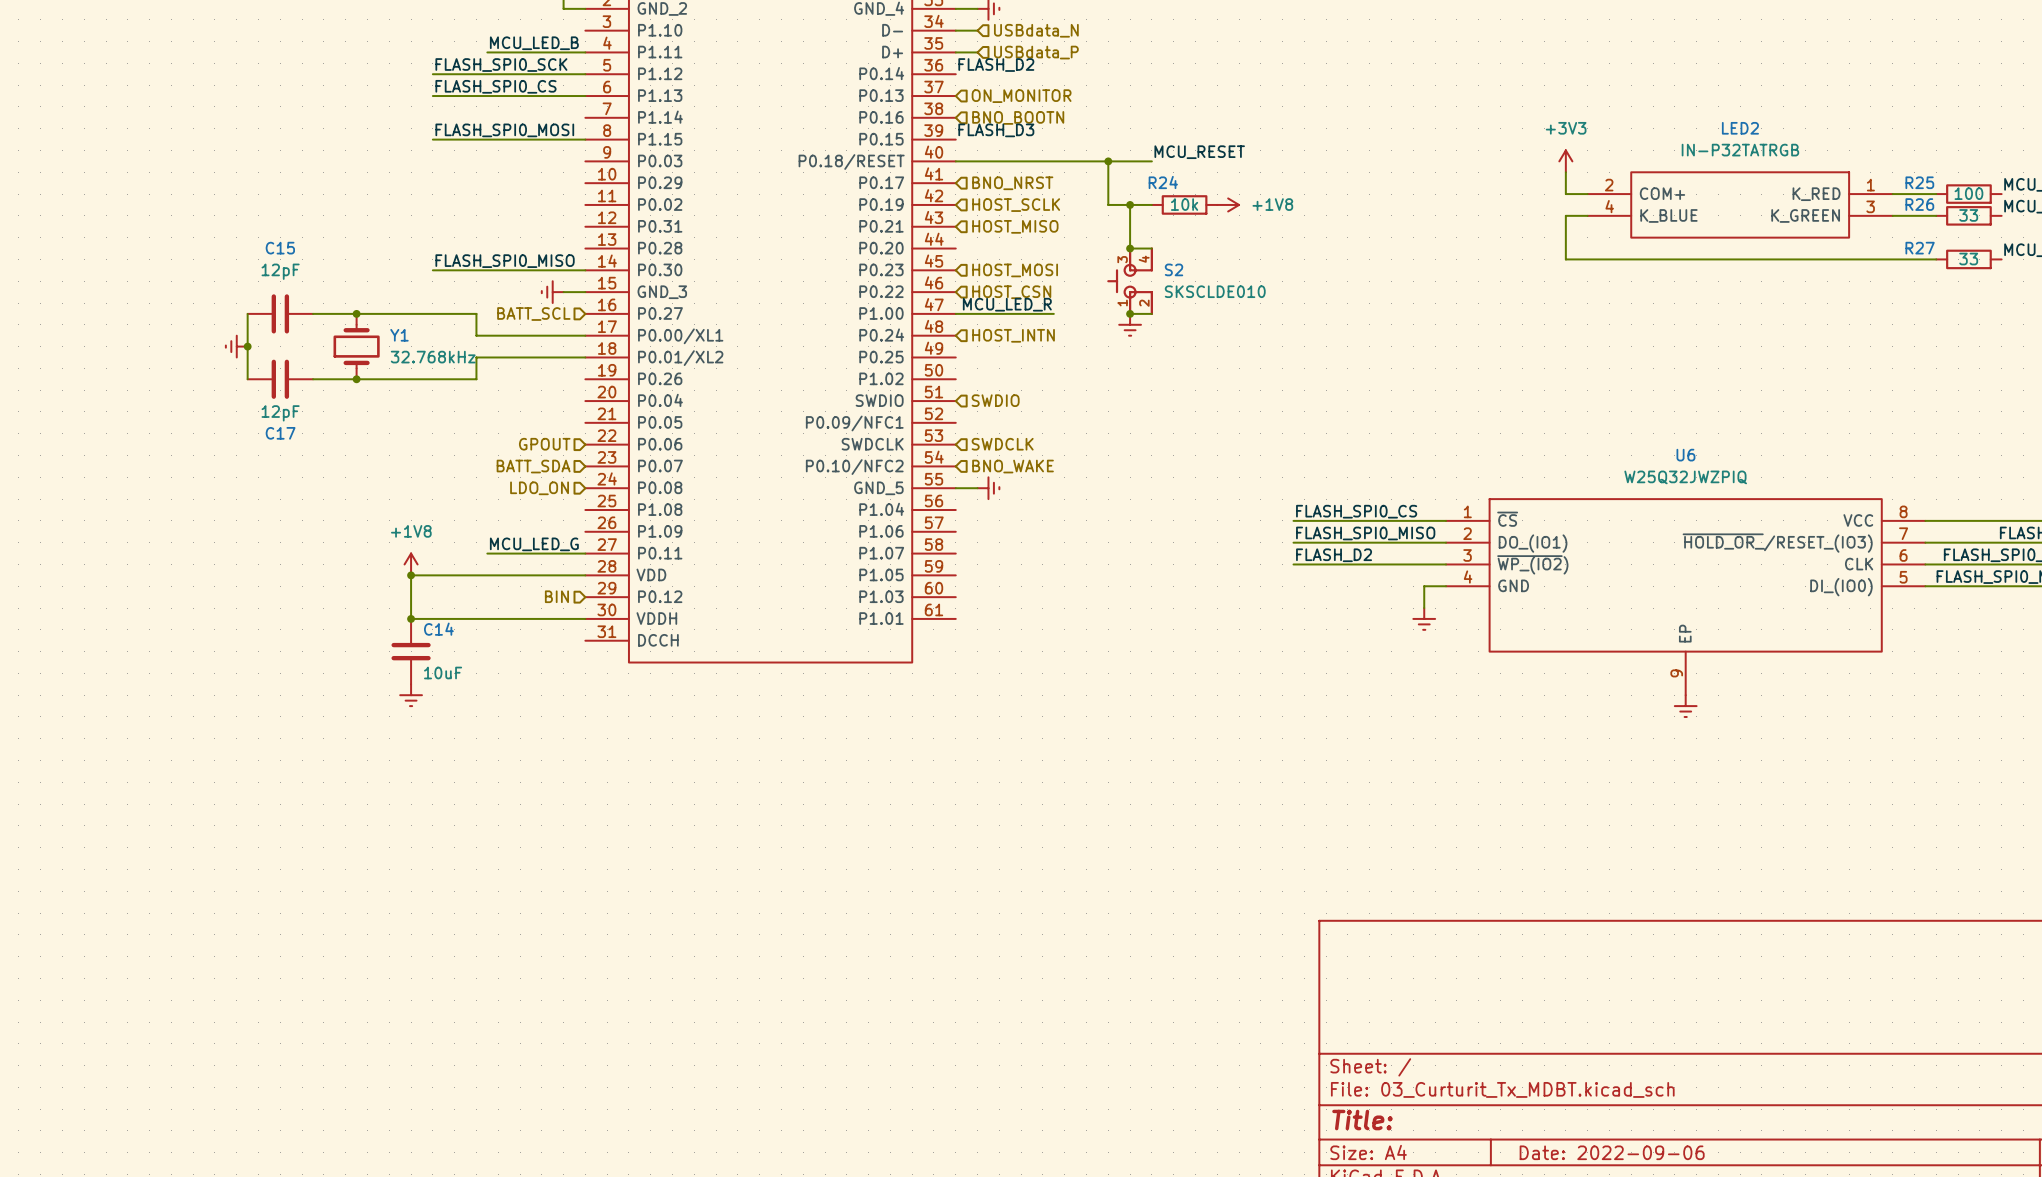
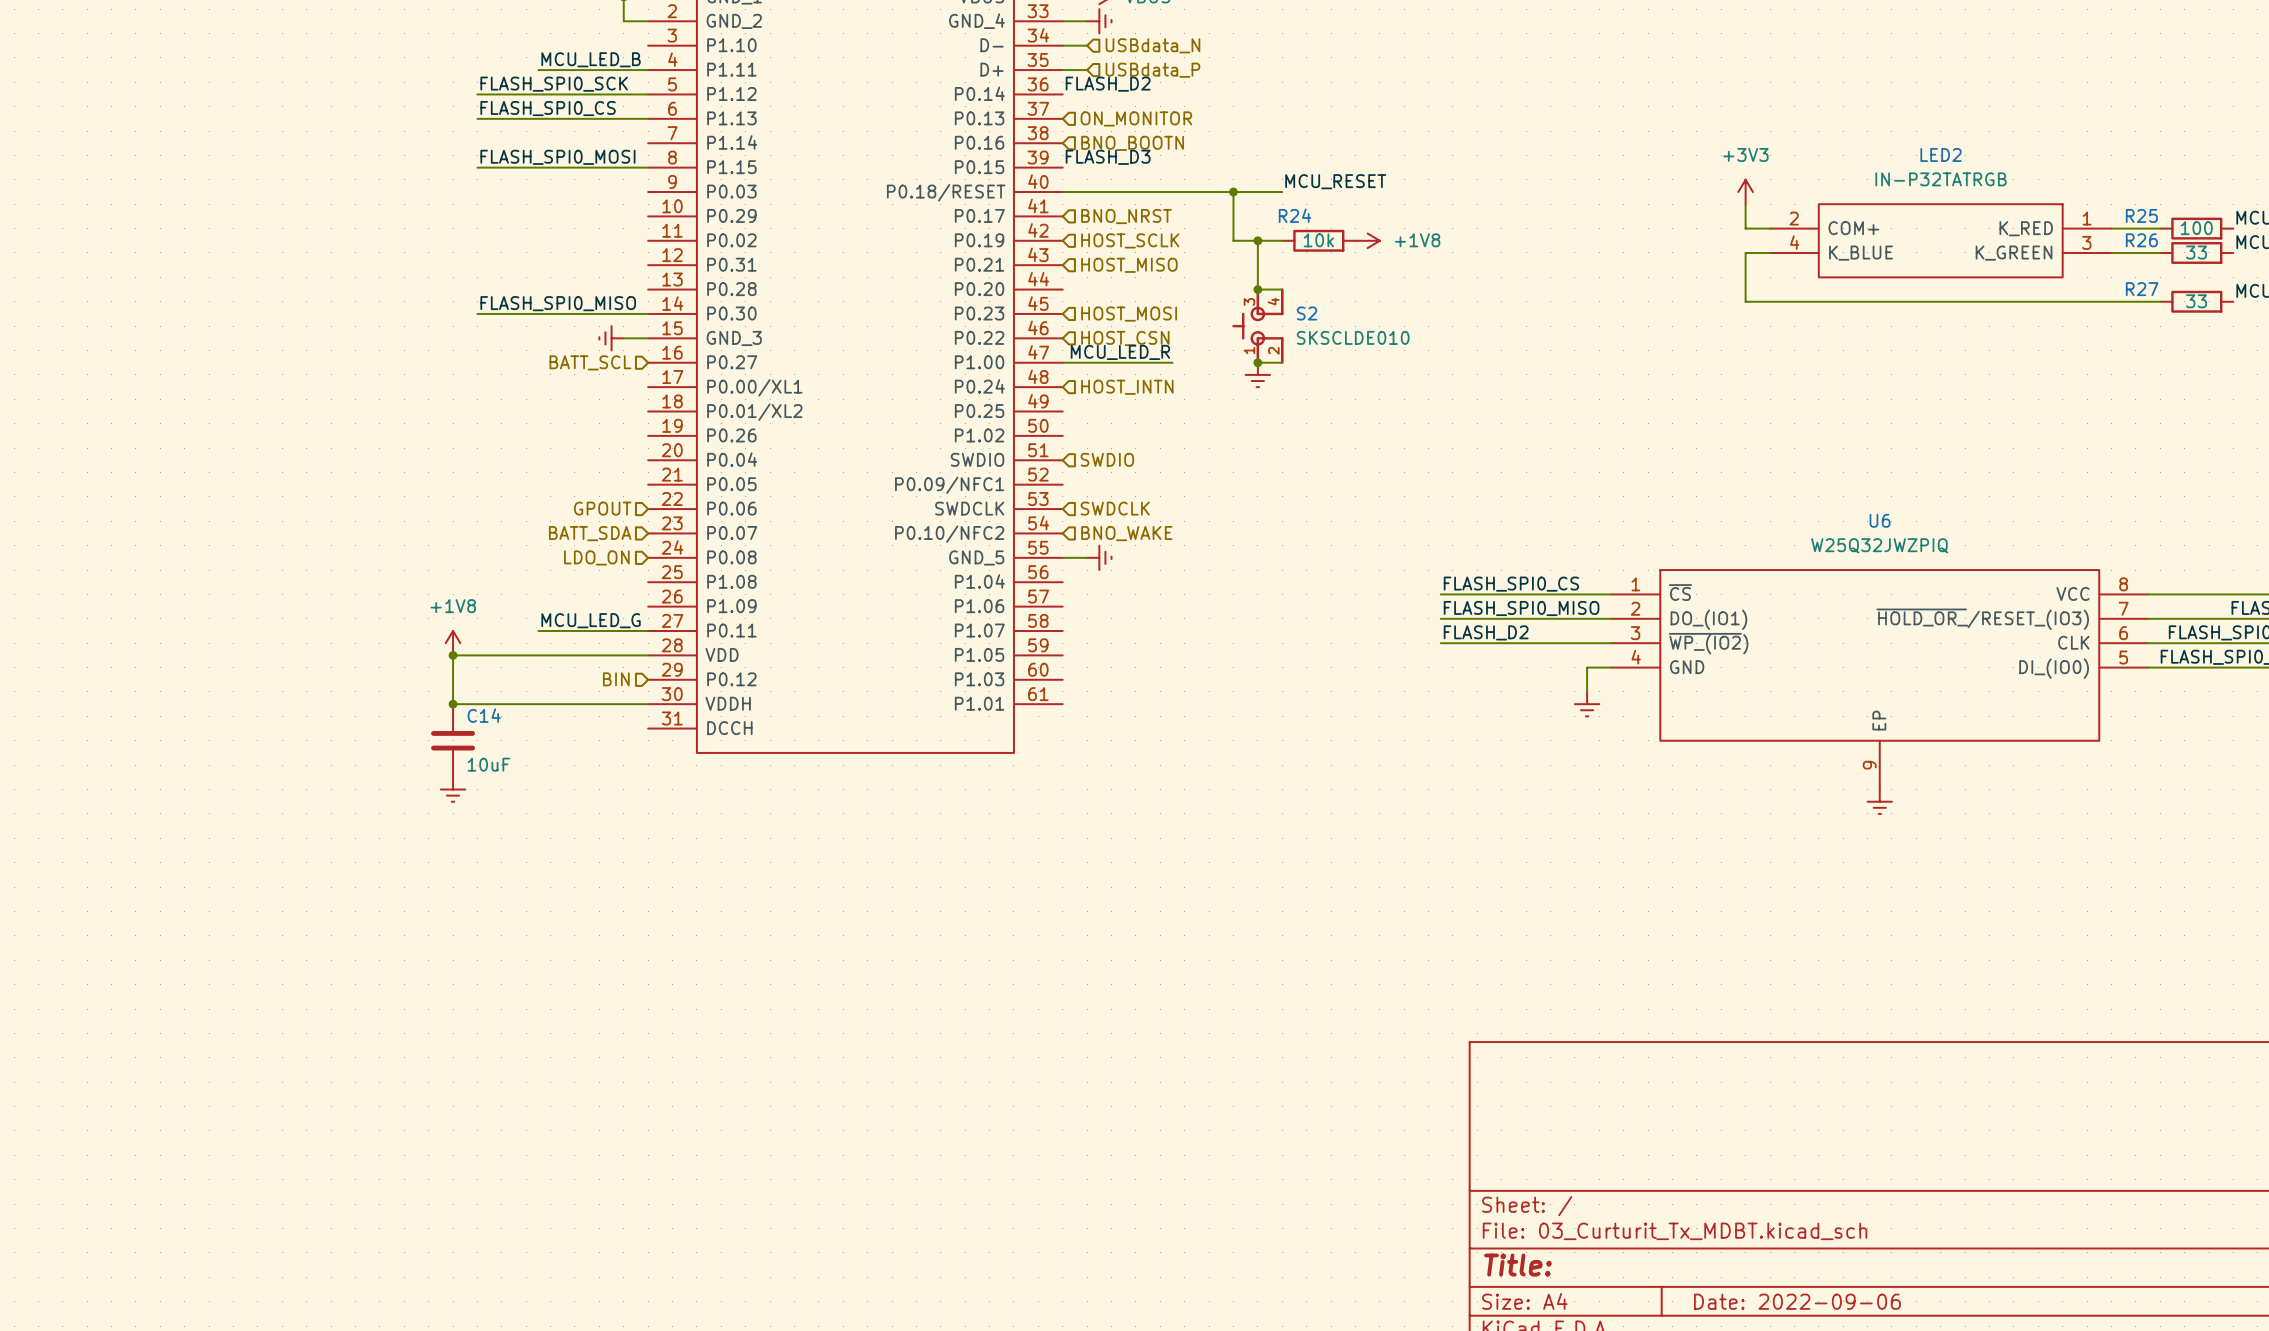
wire: (247, 313) (247, 379) -> none
C15: 12pF (280, 313) -> none
wire: (313, 313) (476, 313) (476, 335) (585, 335) -> none
junction: (356, 313) -> none
power symbol: (236, 346) -> none
junction: (247, 346) -> none
Y1: 32.768kHz (356, 346) -> none
wire: (585, 357) (476, 357) (476, 379) (313, 379) -> none
C17: 12pF (280, 379) -> none
junction: (356, 379) -> none

